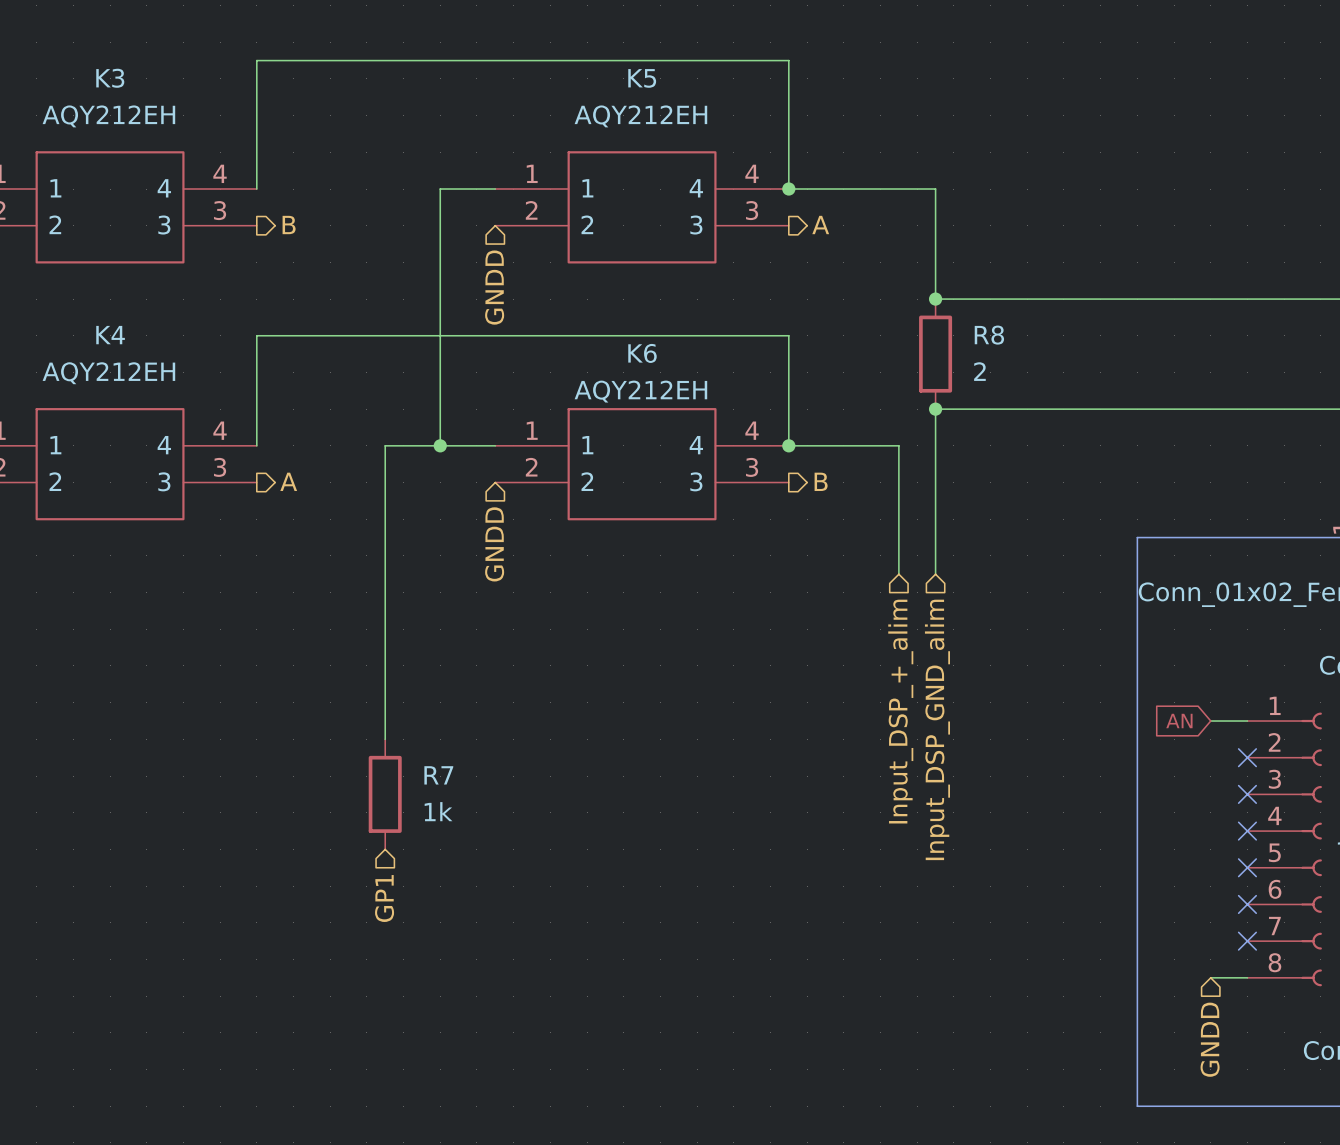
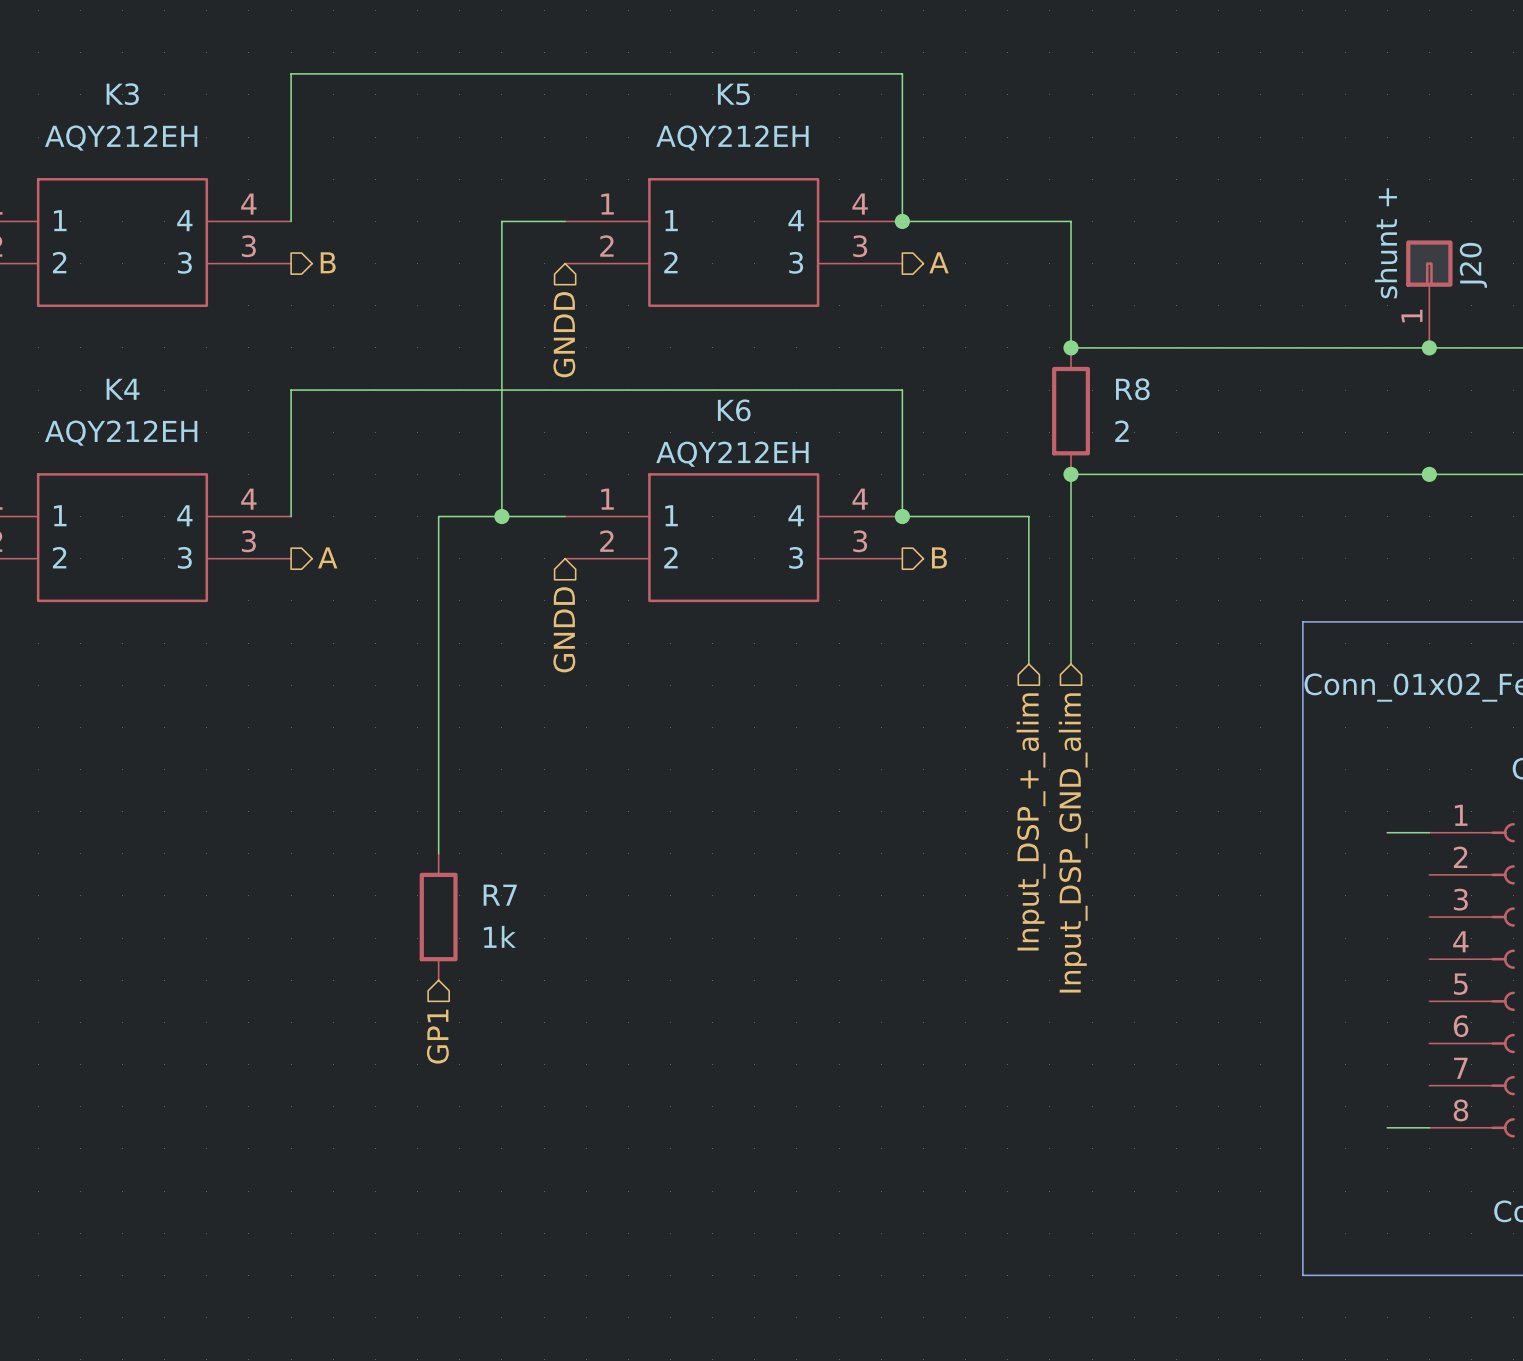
J20: none -> shunt + (1429, 294)
junction: none -> (1429, 347)
junction: none -> (1429, 474)
global label: AN (1179, 721) -> none
no-connect mark: (1247, 757) -> none
no-connect mark: (1247, 794) -> none
no-connect mark: (1247, 831) -> none
no-connect mark: (1247, 867) -> none
no-connect mark: (1247, 904) -> none
no-connect mark: (1247, 941) -> none
hierarchical label: GNDD (1210, 1039) -> none

